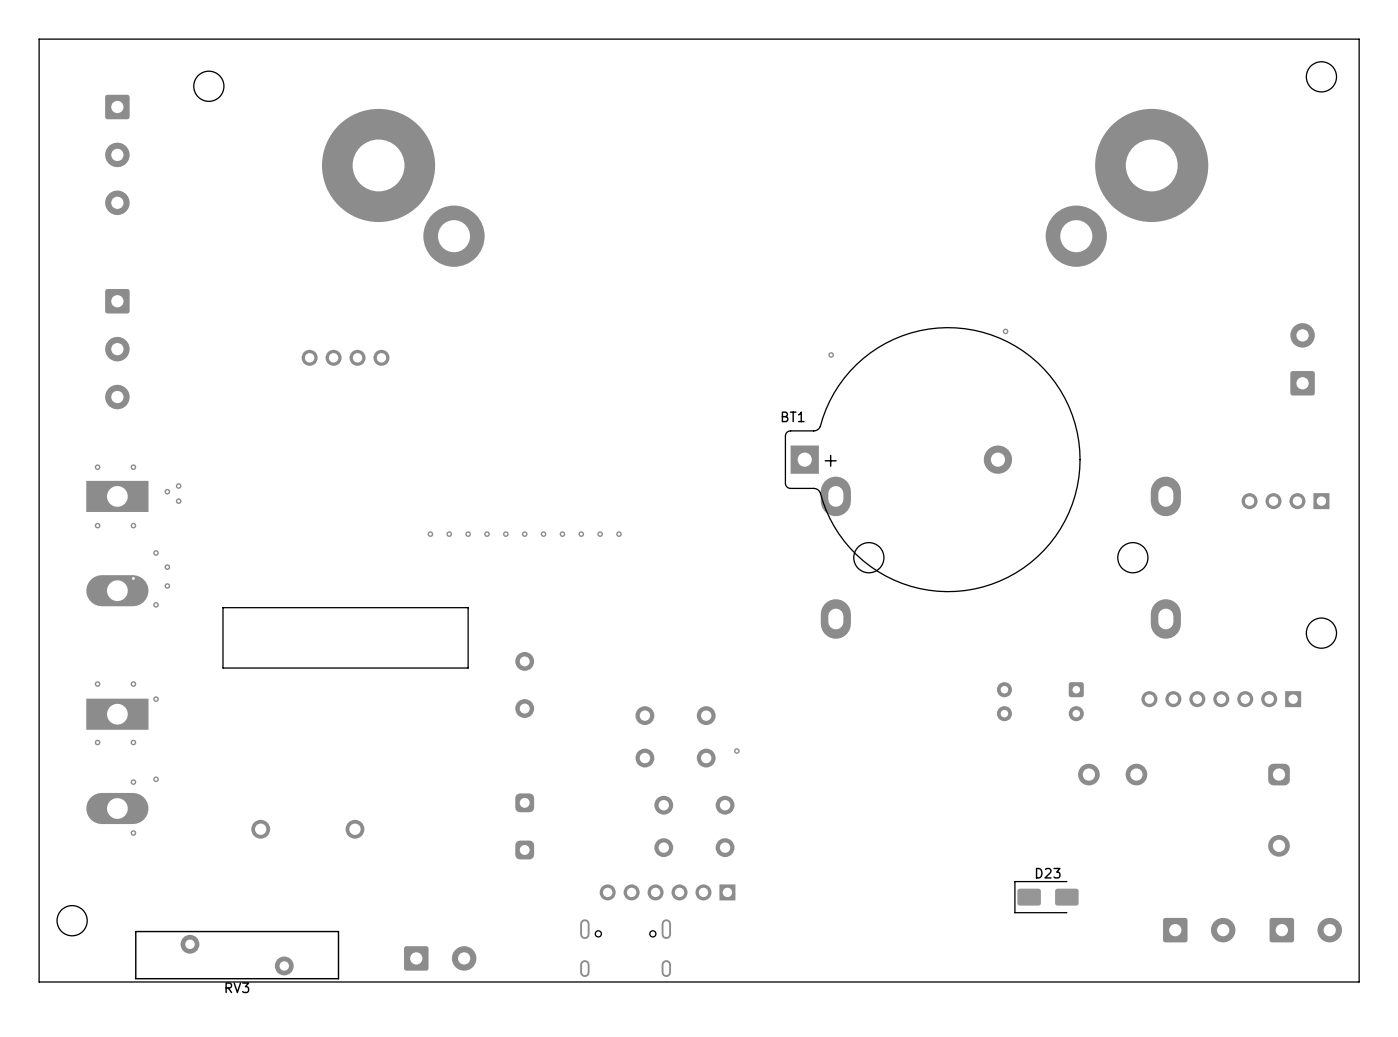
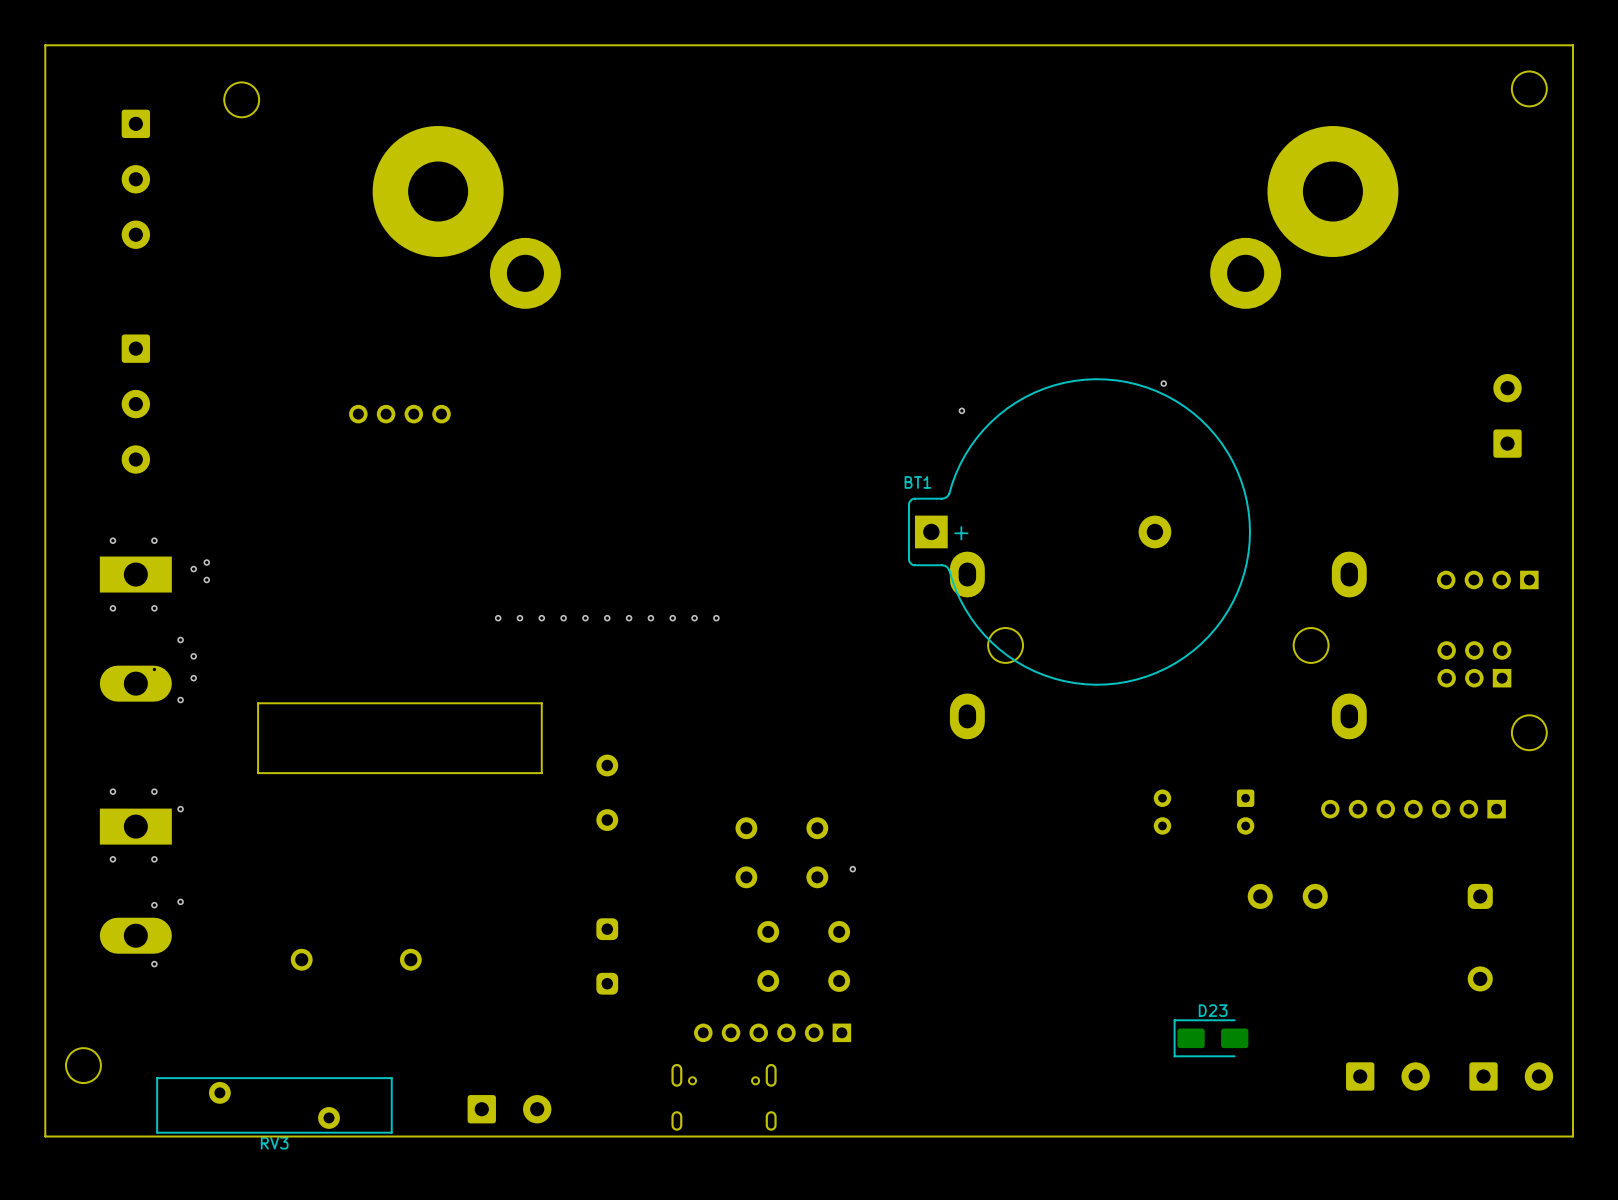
part: none -> (1474, 664)

